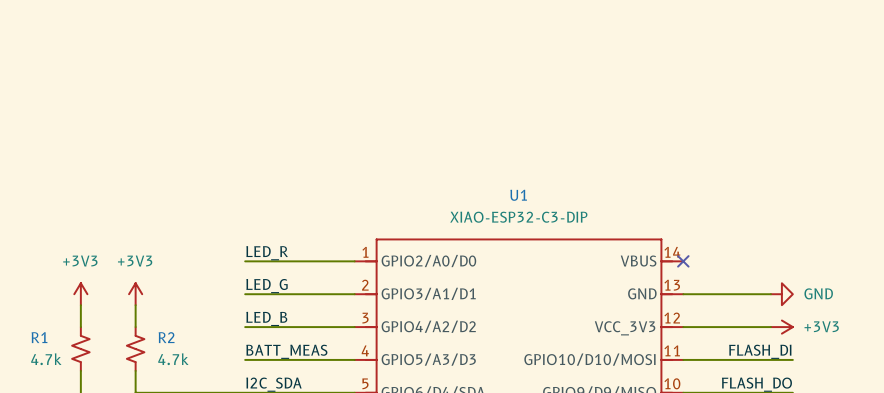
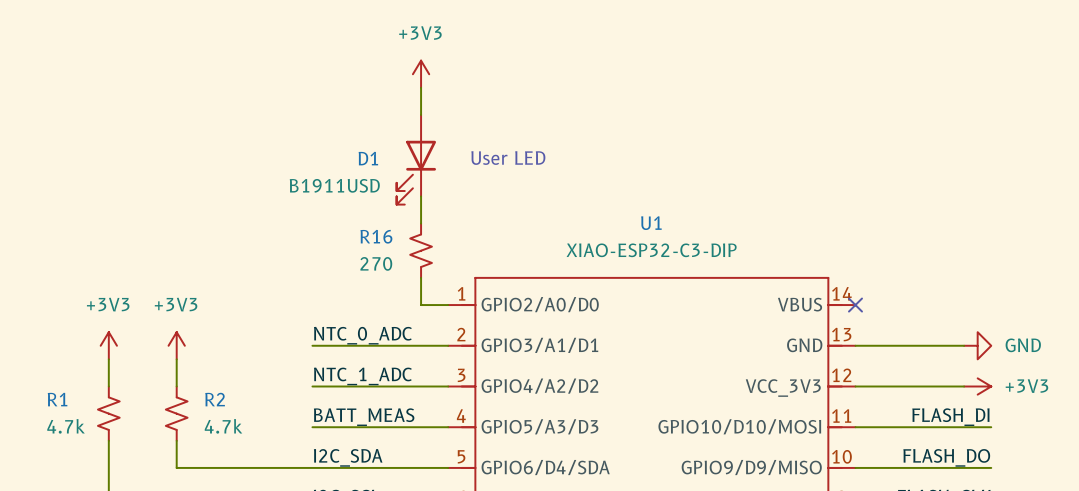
power symbol: none -> +3V3 (421, 74)
wire: none -> (421, 87) (421, 114)
text: none -> User LED (508, 158)
D1: none -> B1911USD (416, 159)
wire: none -> (421, 196) (421, 223)
R16: none -> 270 (421, 250)
label: LED_R (267, 253) -> none
wire: (245, 261) (332, 261) -> (421, 277) (421, 305)
label: LED_G (267, 286) -> NTC_0_ADC (362, 335)
label: LED_B (266, 318) -> NTC_1_ADC (362, 376)

